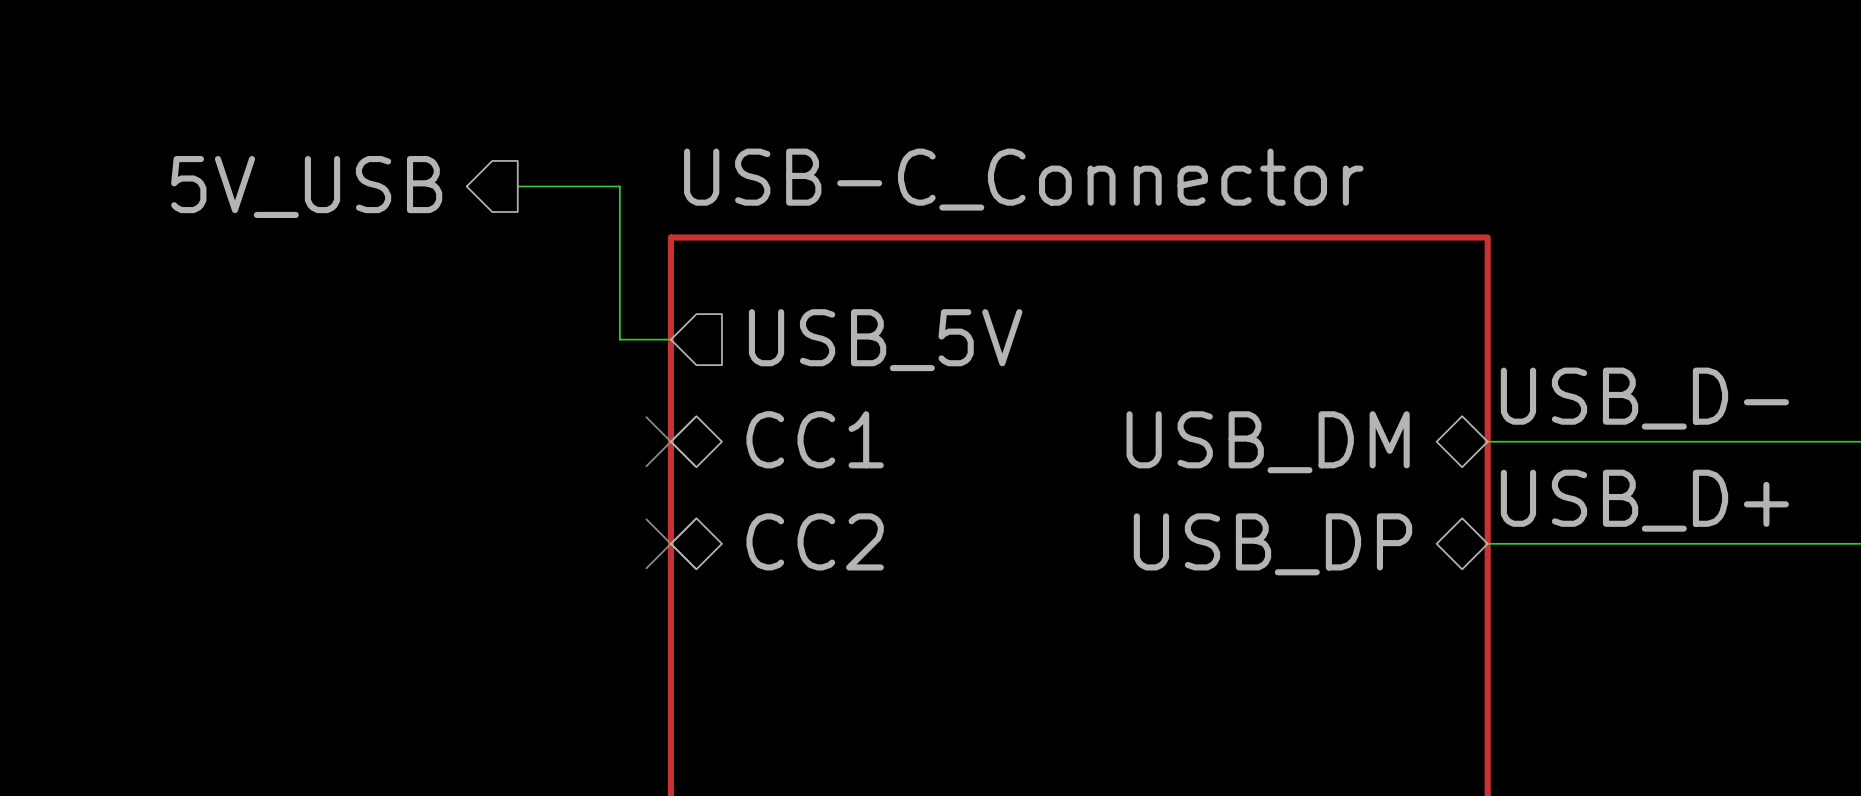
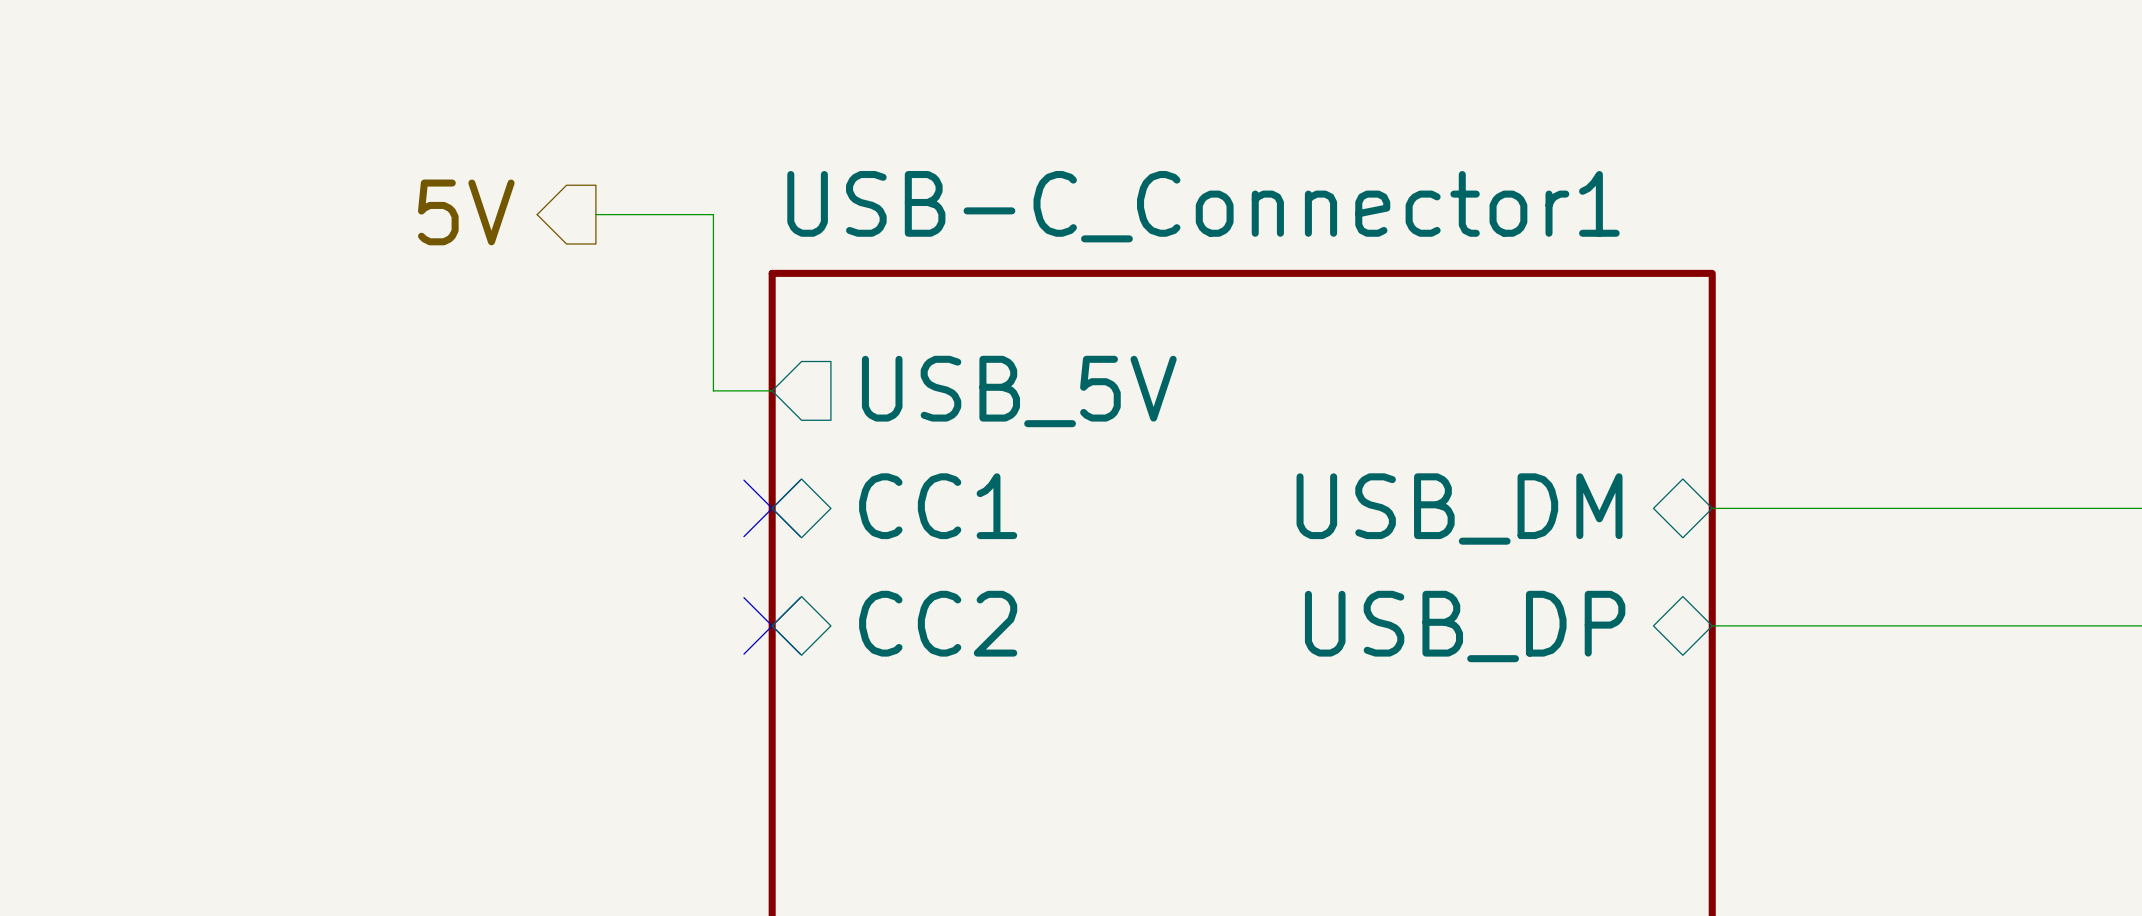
sheet USB-C_Connector name: USB-C_Connector (1023, 179) -> USB-C_Connector1 (1203, 206)
hierarchical label: 5V_USB (306, 187) -> 5V (466, 212)
label: USB_D- (1644, 398) -> none
label: USB_D+ (1644, 500) -> none

